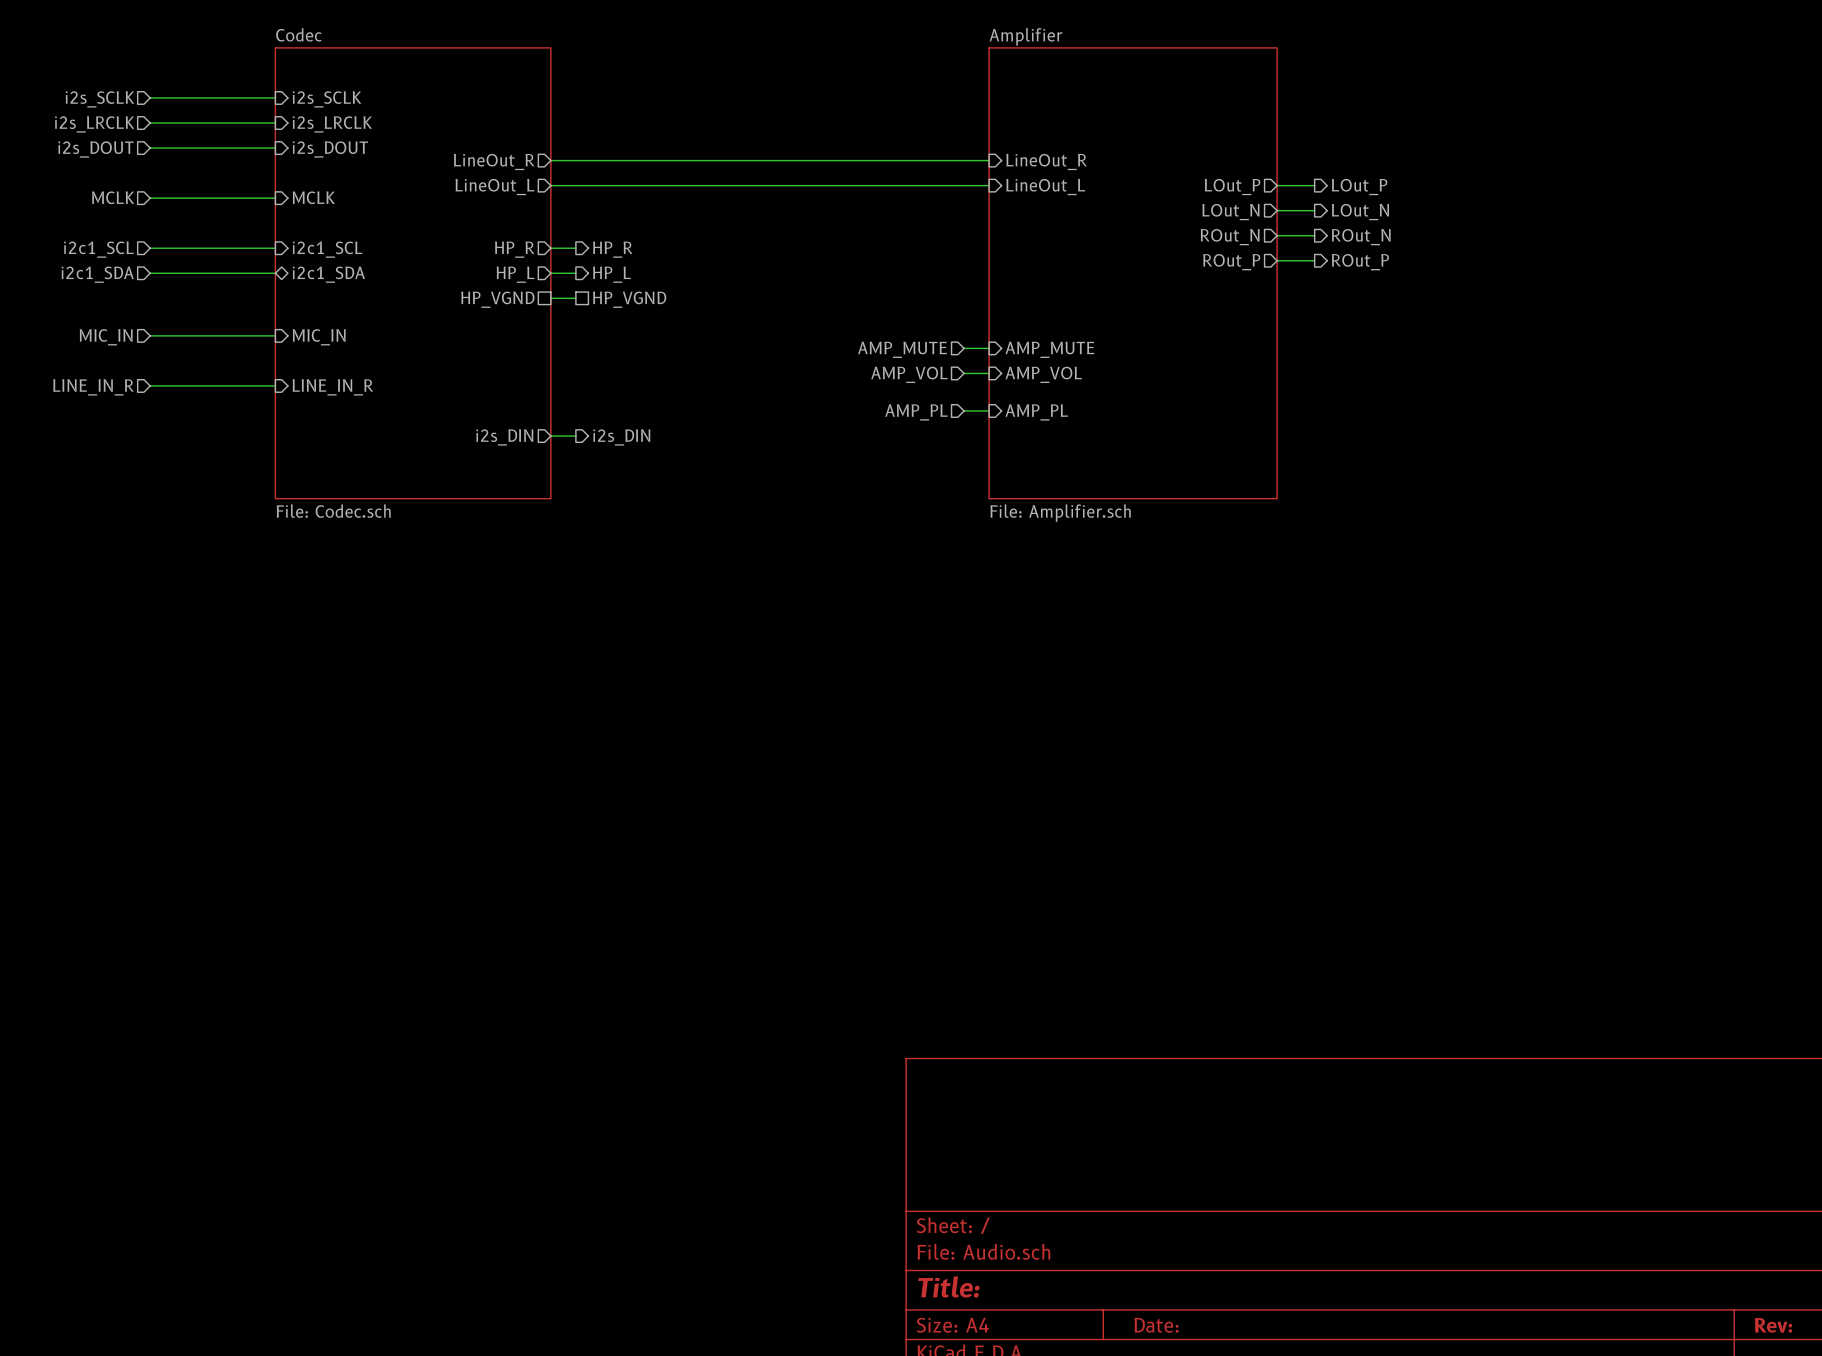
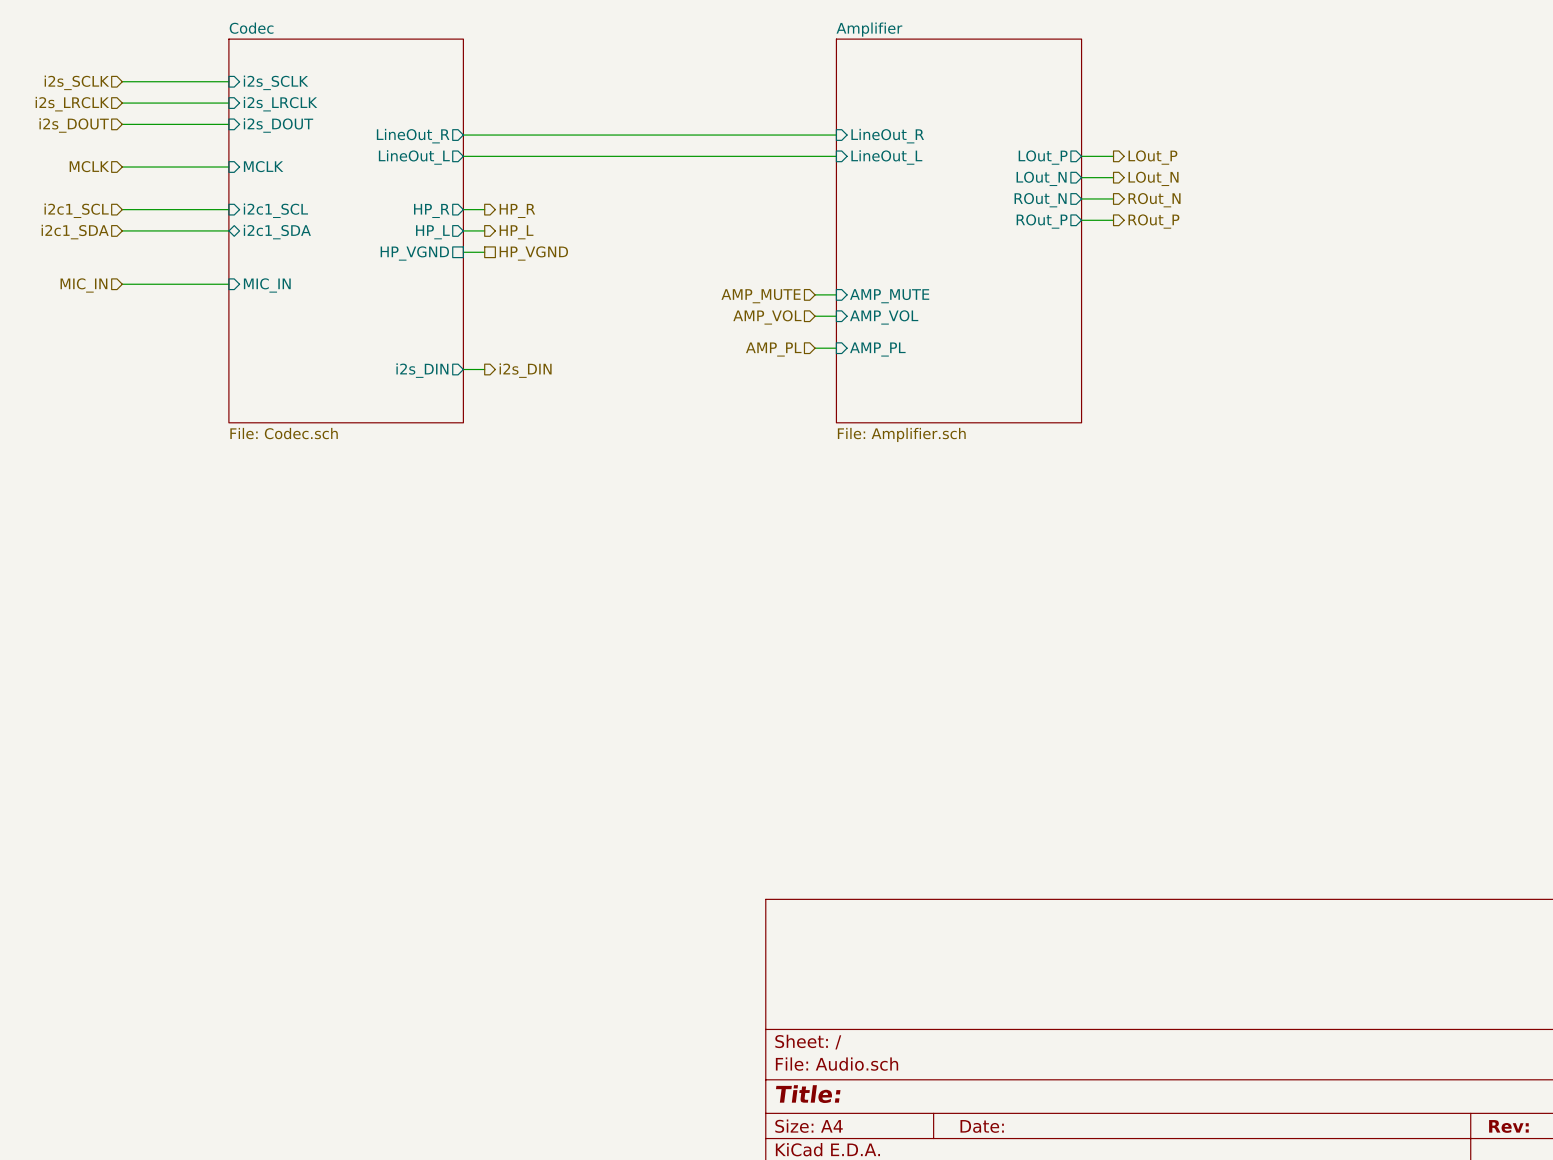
wire: (150, 385) (275, 385) -> none
hierarchical label: LINE_IN_R (93, 387) -> none
sheet pin: LINE_IN_R (332, 387) -> none

